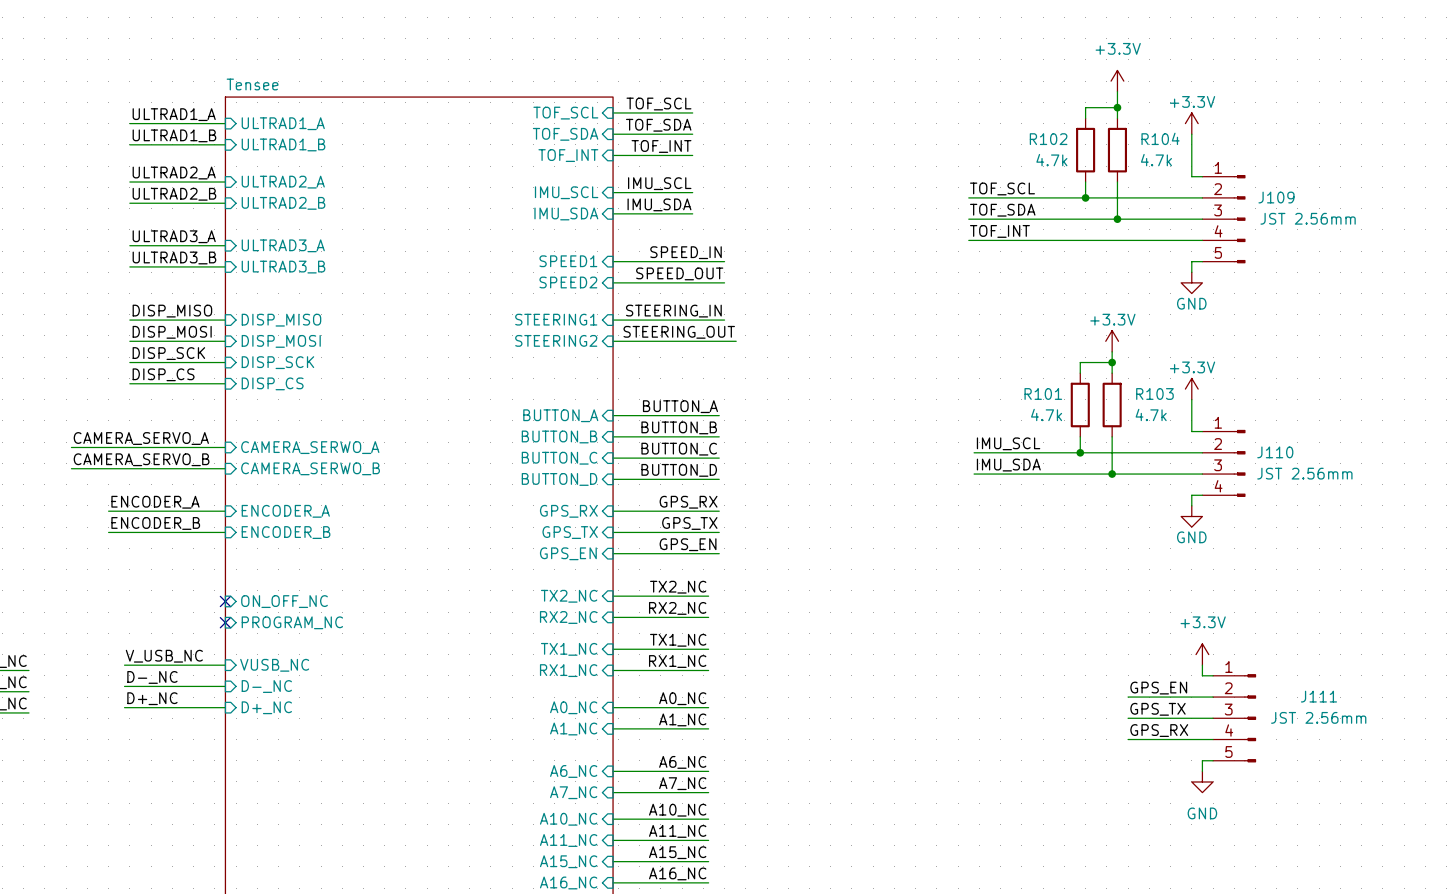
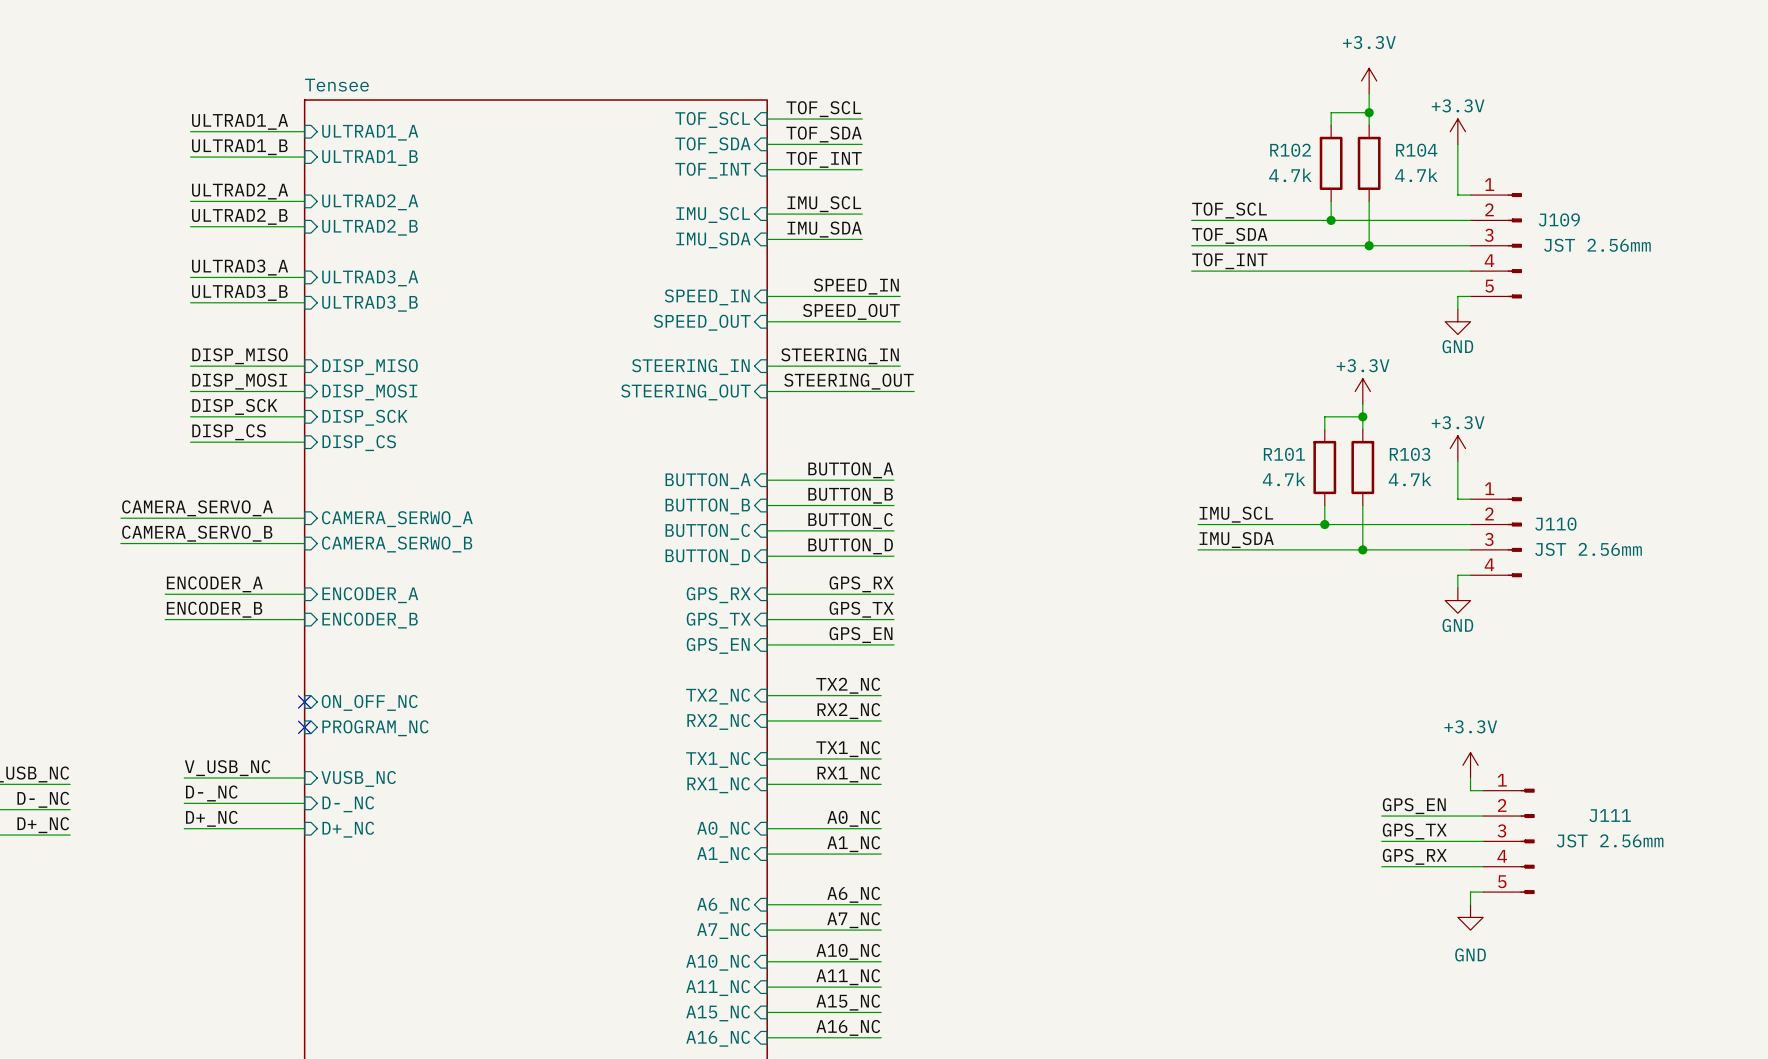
sheet pin: SPEED1 (568, 261) -> SPEED_IN (707, 297)
sheet pin: SPEED2 (568, 282) -> SPEED_OUT (702, 322)
sheet pin: STEERING1 (556, 319) -> STEERING_IN (690, 367)
sheet pin: STEERING2 (556, 340) -> STEERING_OUT (685, 392)

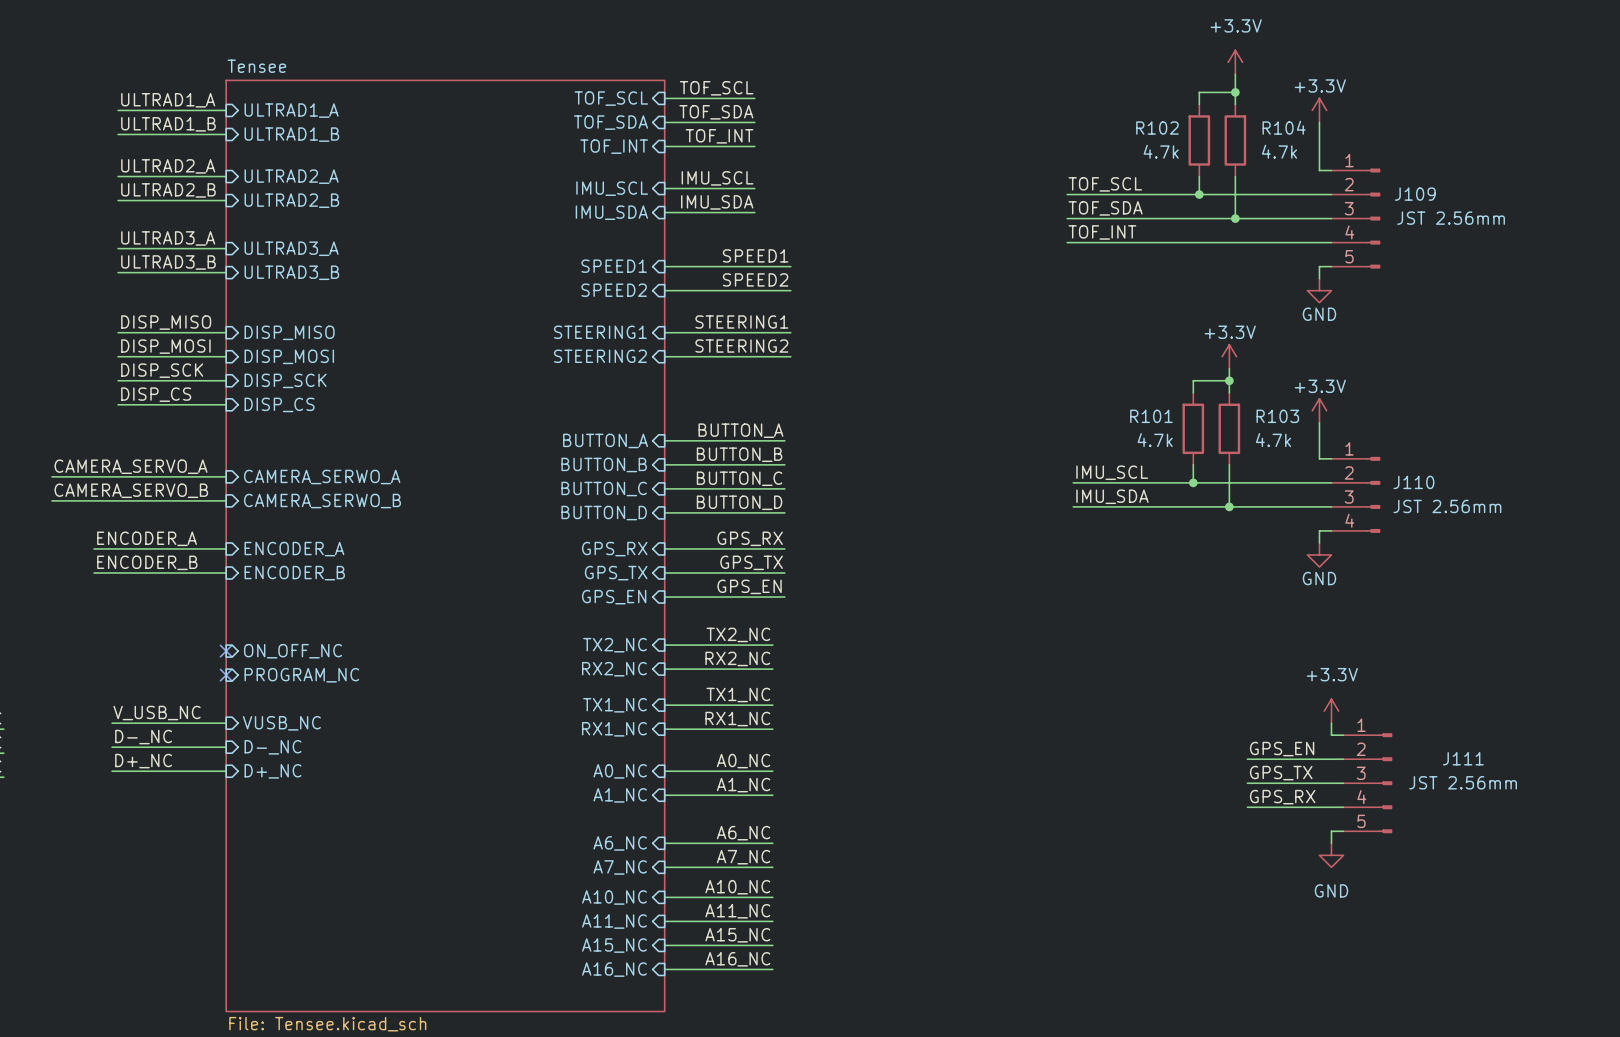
label: SPEED_IN (856, 286) -> SPEED1 (755, 255)
sheet pin: SPEED_IN (707, 297) -> SPEED1 (614, 266)
label: SPEED_OUT (851, 311) -> SPEED2 (755, 279)
sheet pin: SPEED_OUT (702, 322) -> SPEED2 (614, 290)
label: STEERING_IN (840, 356) -> STEERING1 (741, 321)
sheet pin: STEERING_IN (690, 367) -> STEERING1 (600, 332)
label: STEERING_OUT (848, 381) -> STEERING2 (741, 346)
wire: (900, 391) (914, 391) -> none
sheet pin: STEERING_OUT (685, 392) -> STEERING2 (600, 356)

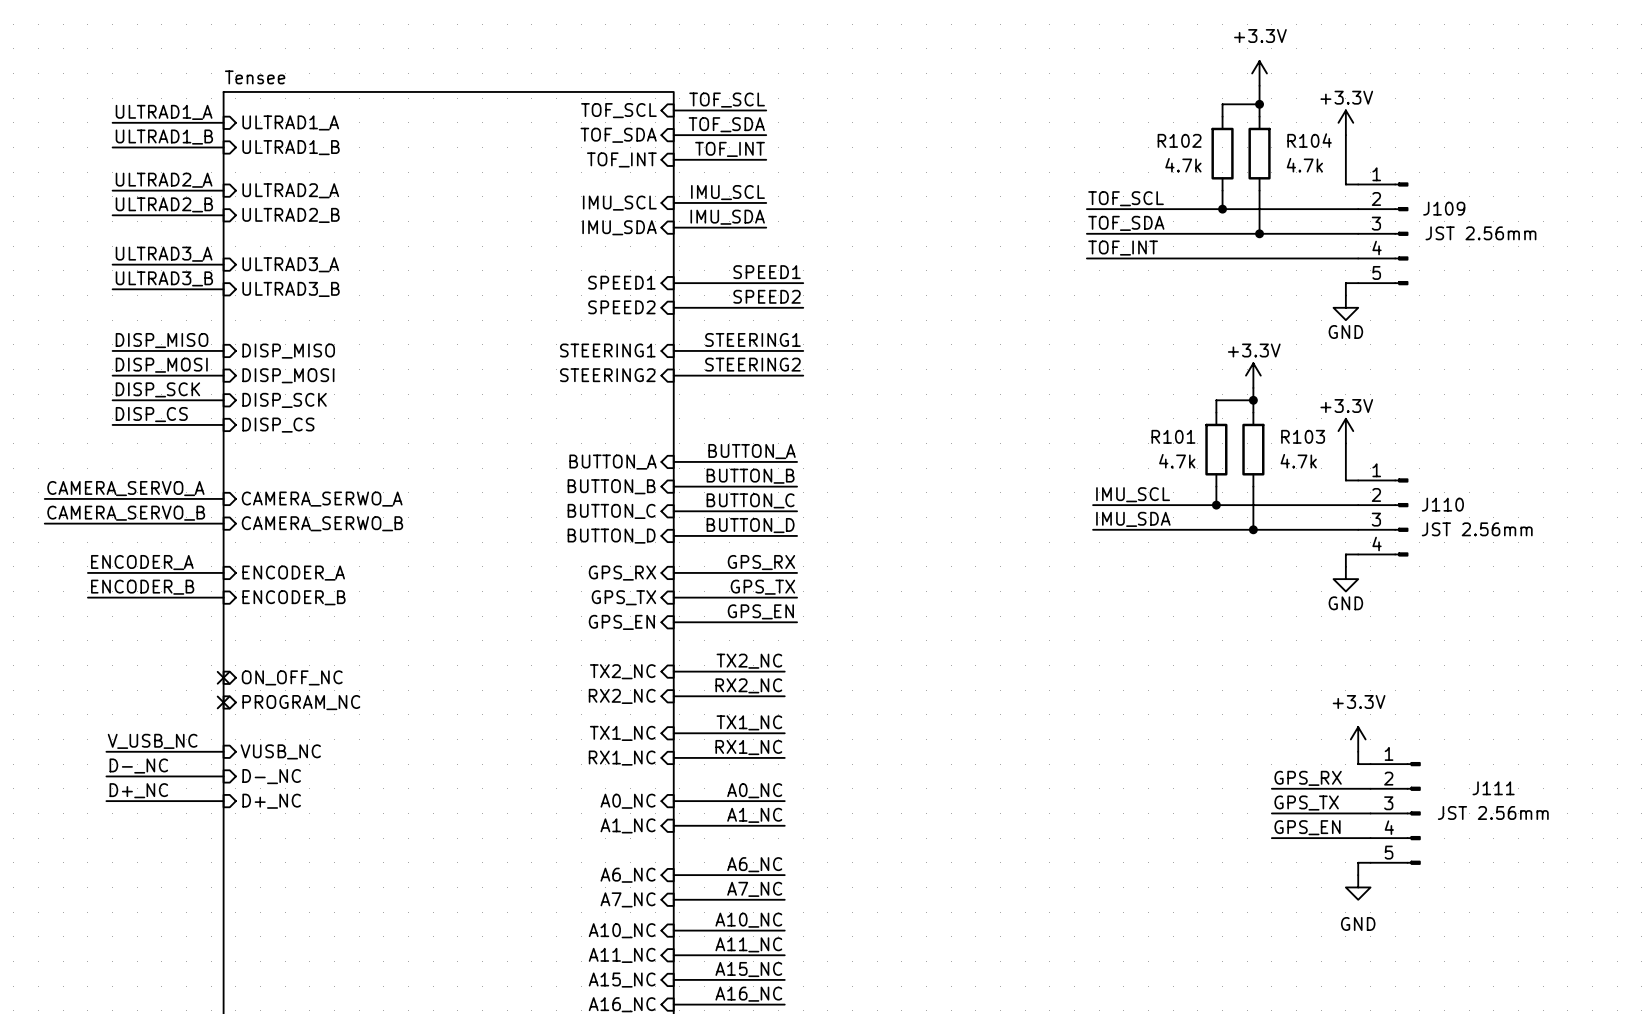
label: GPS_EN (1282, 749) -> GPS_RX (1308, 778)
label: GPS_RX (1282, 797) -> GPS_EN (1307, 827)

